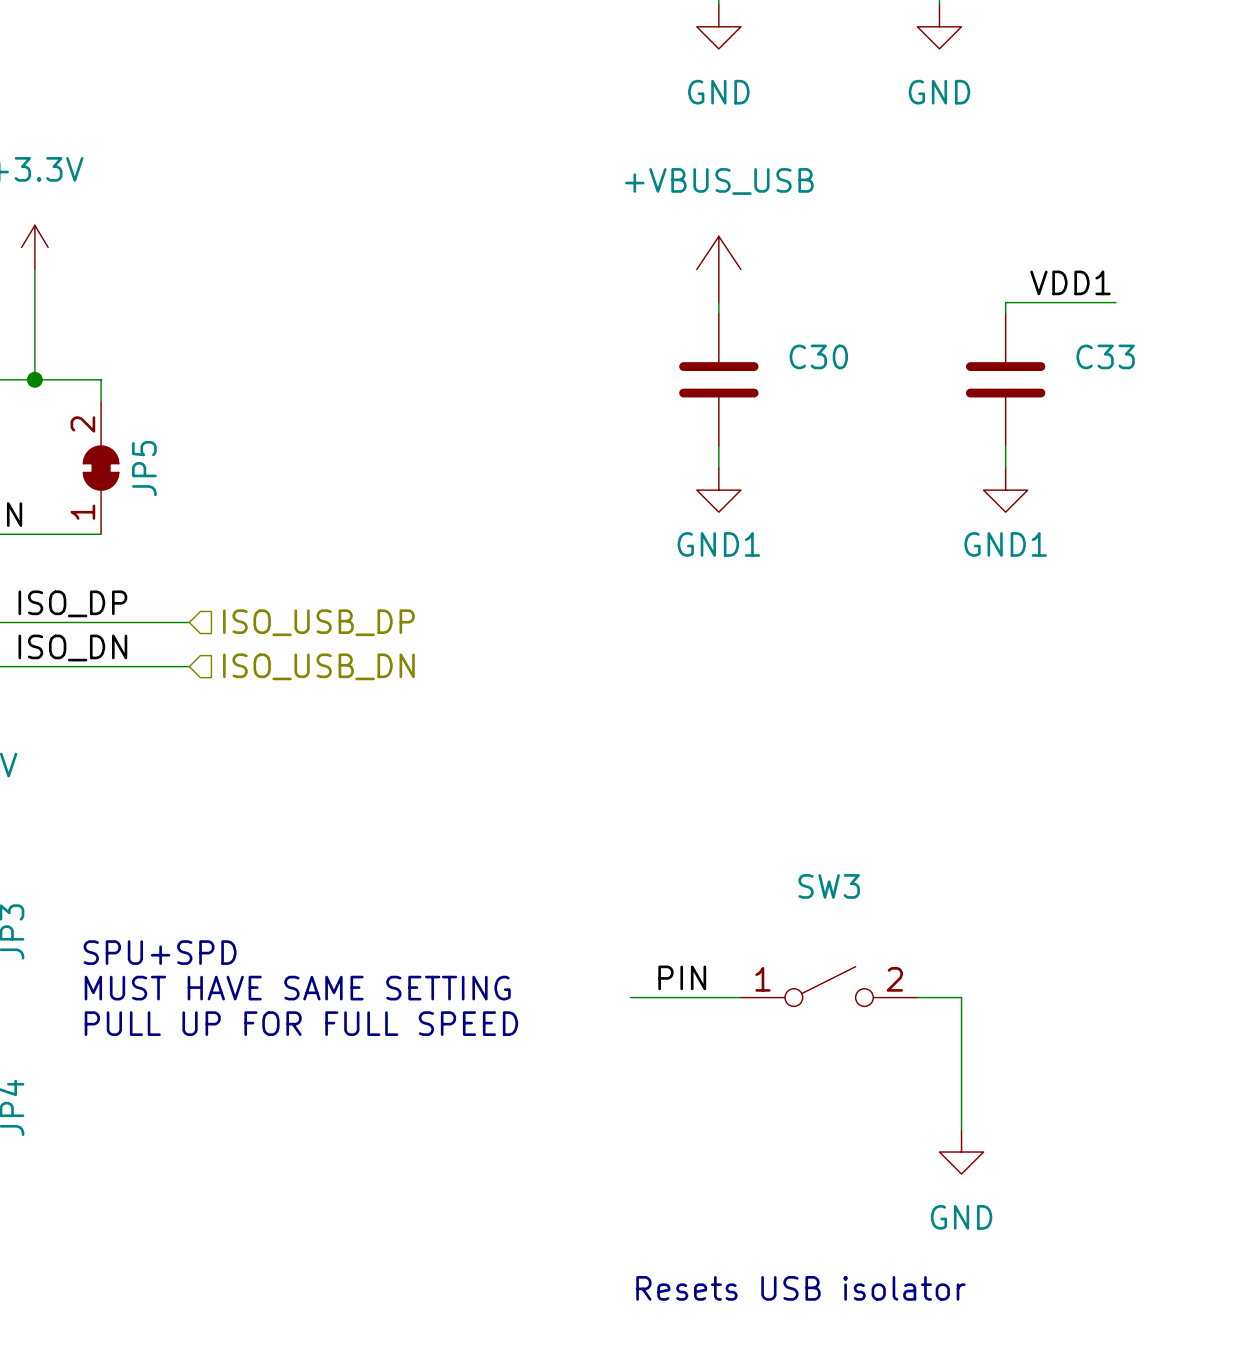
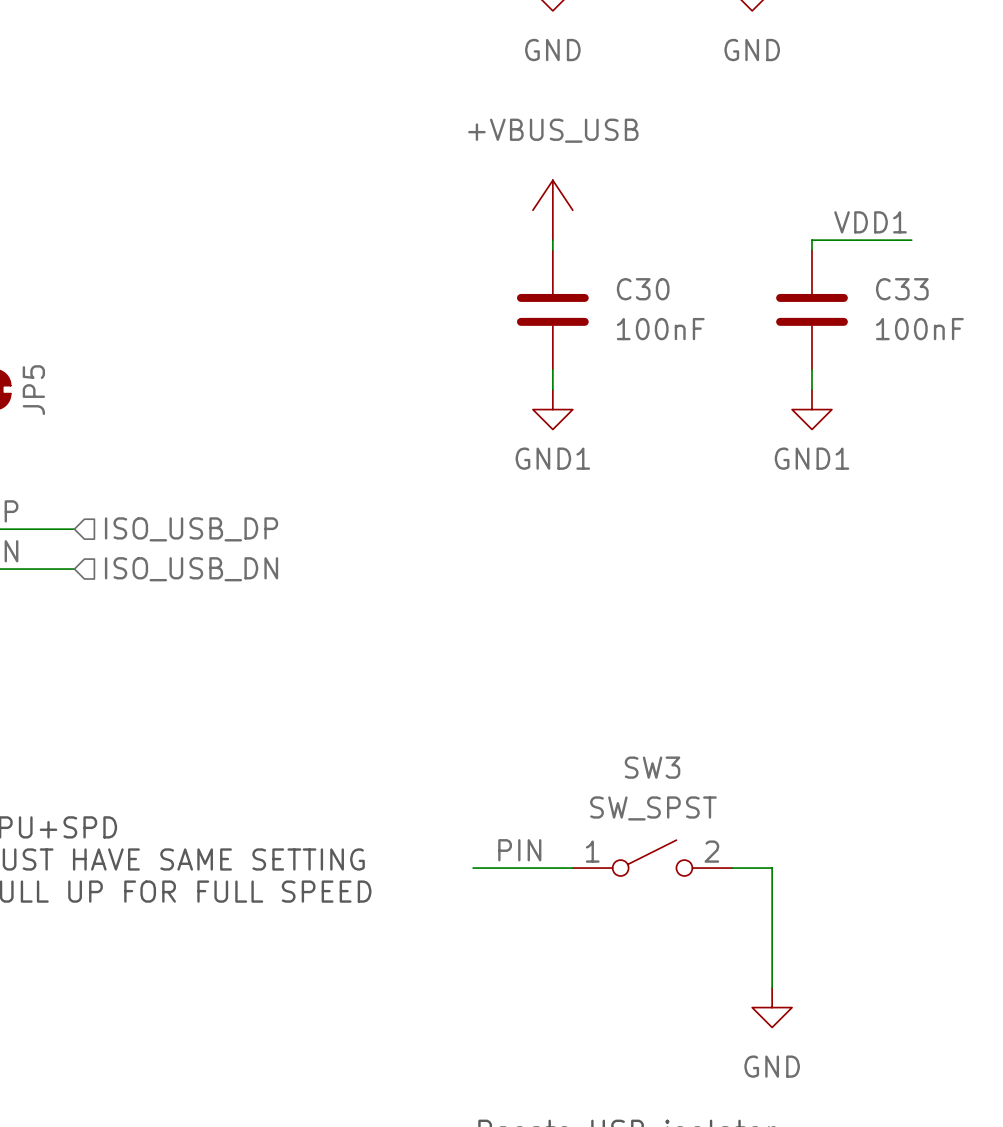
C30 value: none -> 100nF (660, 329)
C33 value: none -> 100nF (919, 329)
SW3 value: none -> SW_SPST (653, 808)

